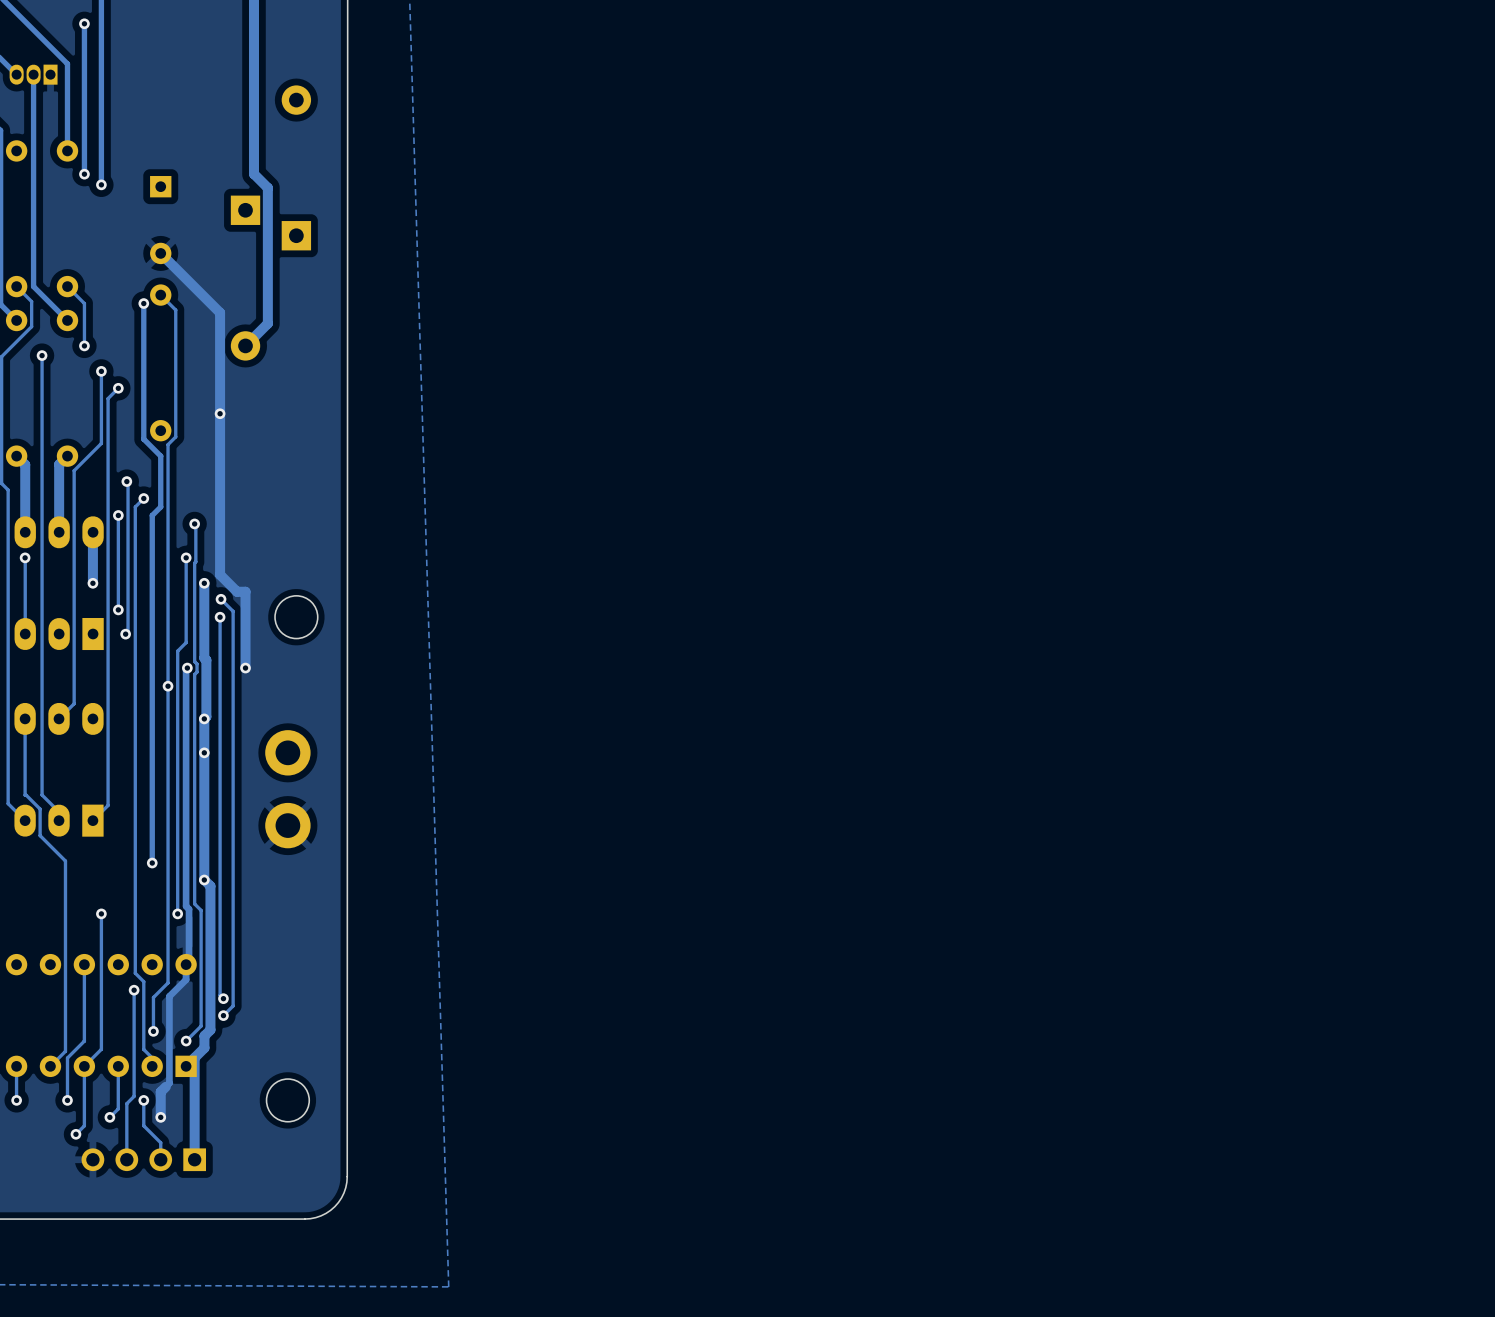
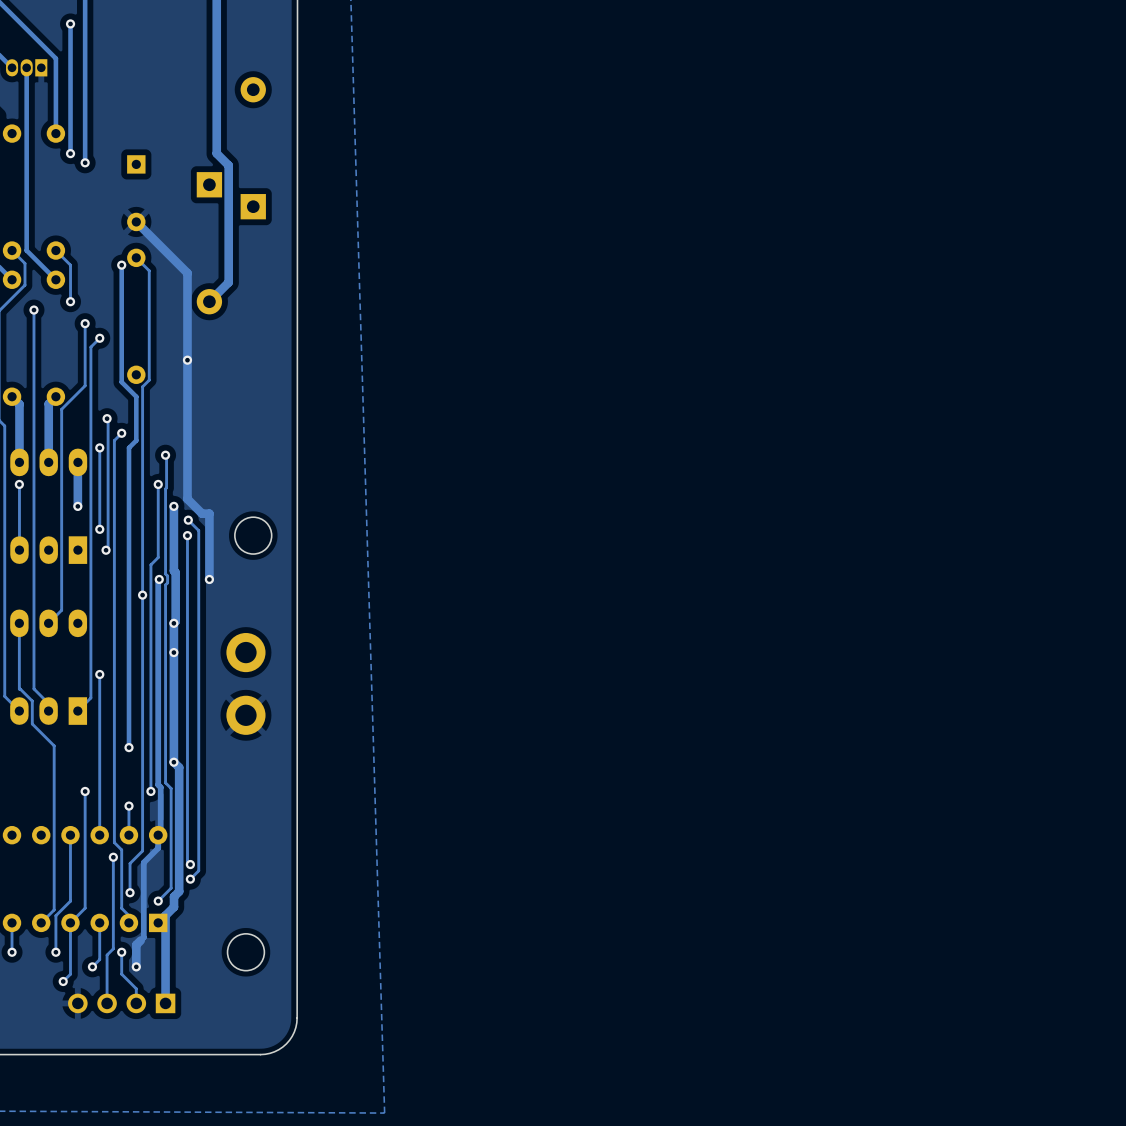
track: none -> (99, 674) (99, 835)
via: none -> (99, 674)
track: none -> (128, 806) (128, 835)
via: none -> (129, 806)

